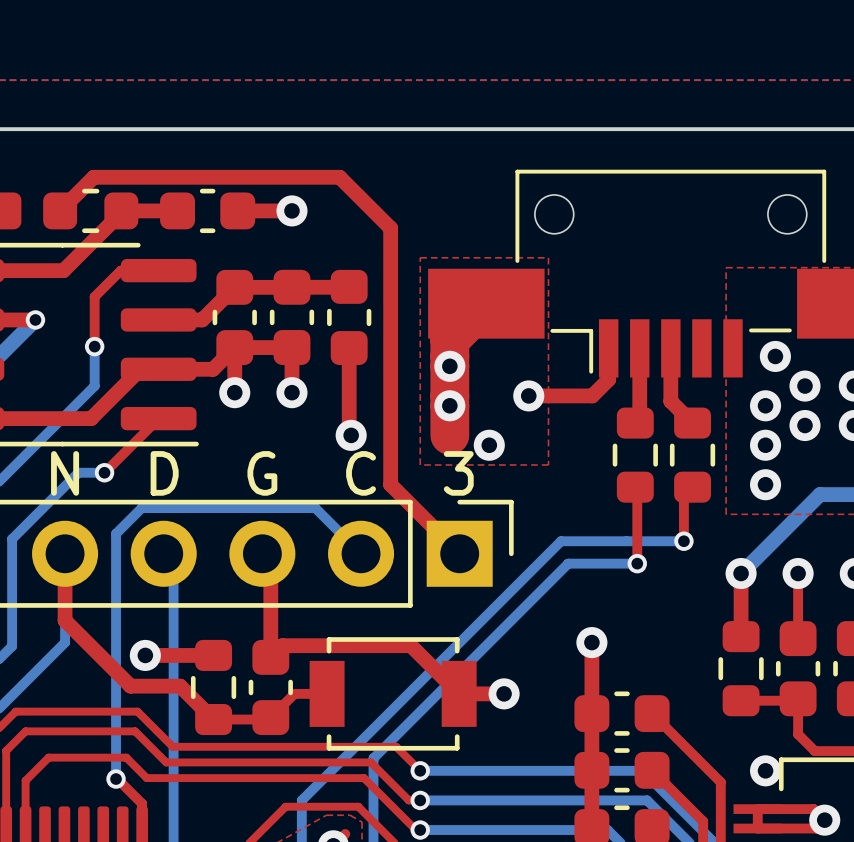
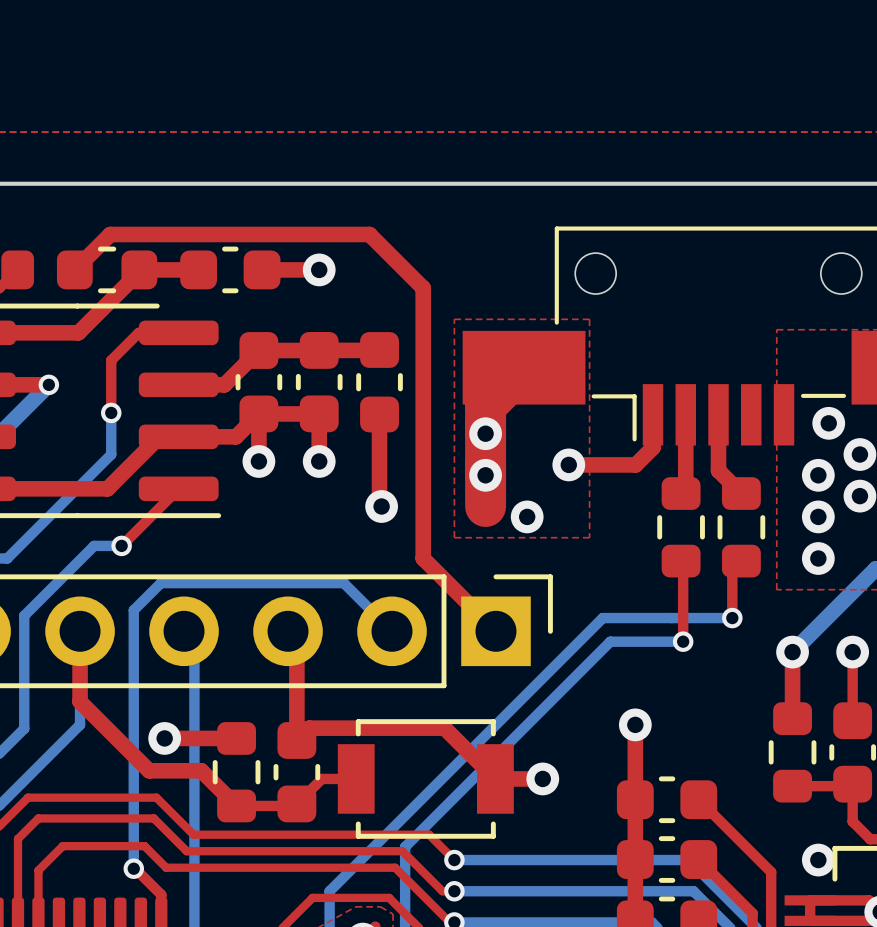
text: N (65, 473) -> none
text: D (164, 473) -> none
text: G (262, 473) -> none
text: C (361, 473) -> none
text: 3 (458, 473) -> none

